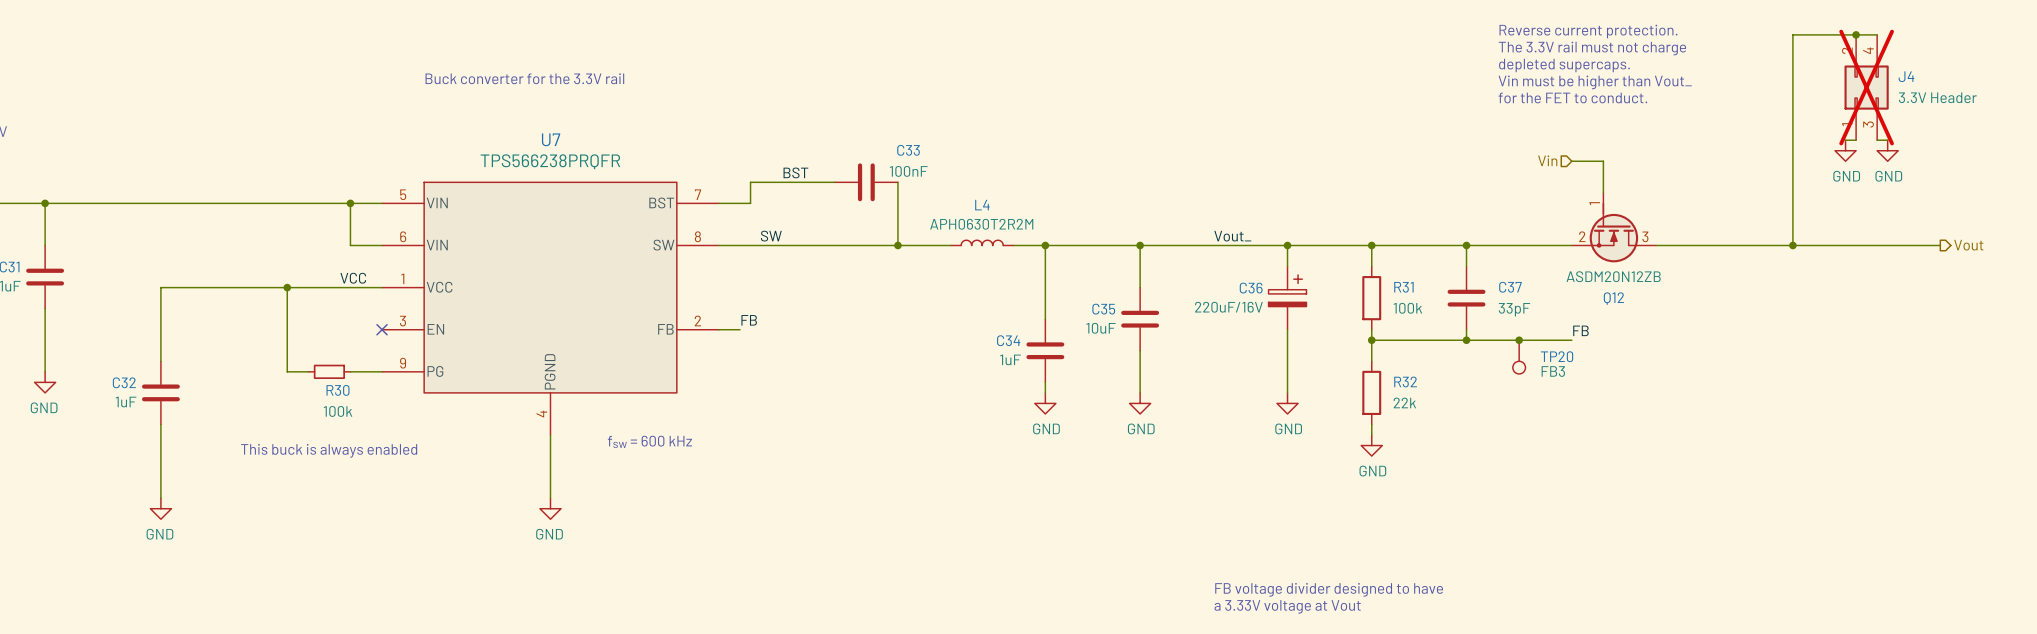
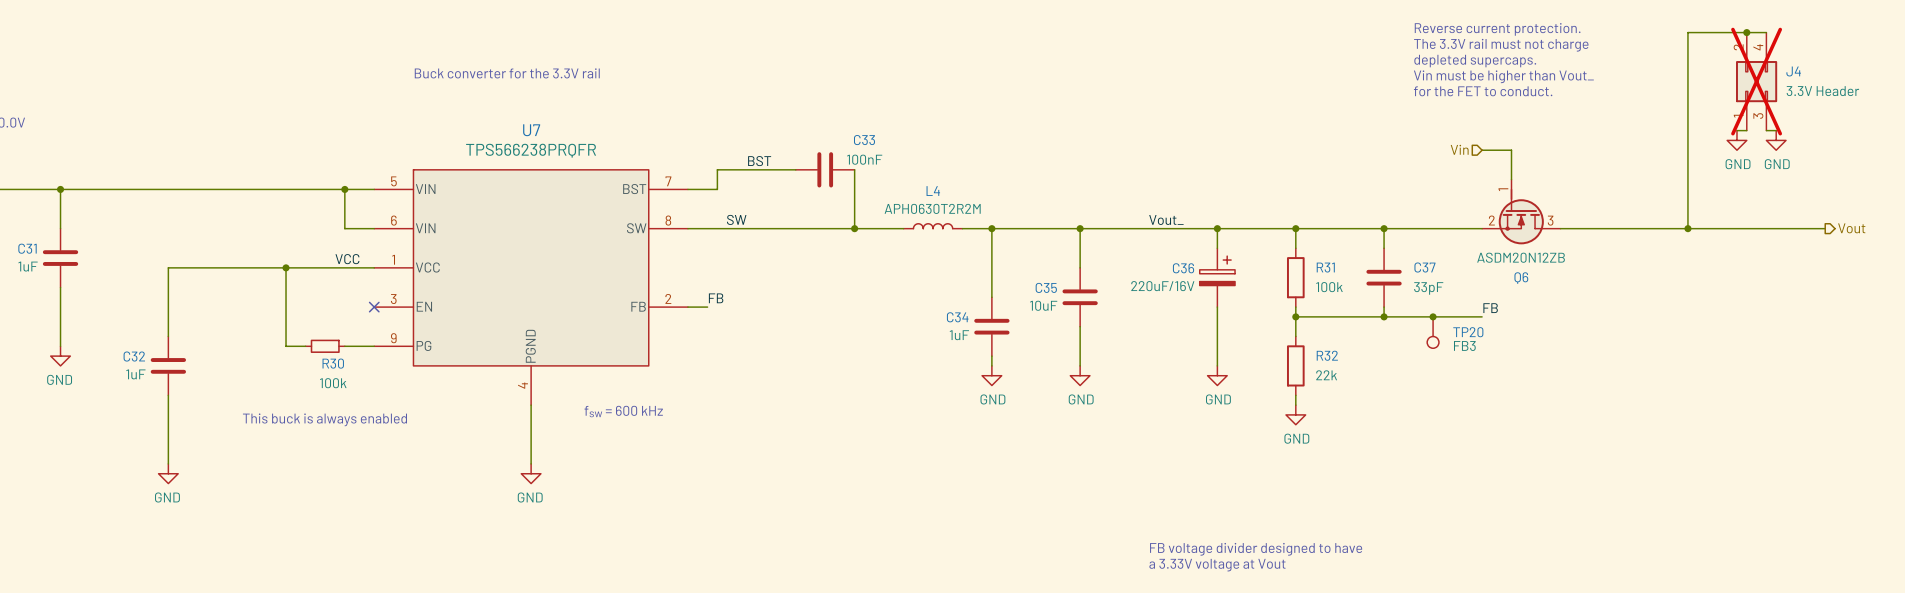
Q12 name: Q12 (1613, 298) -> Q6 (1521, 278)

